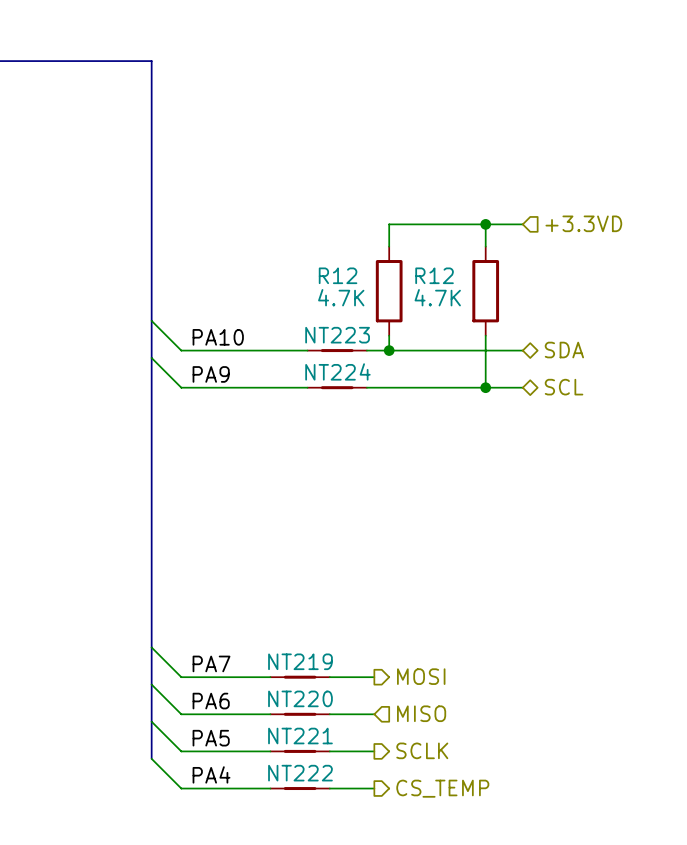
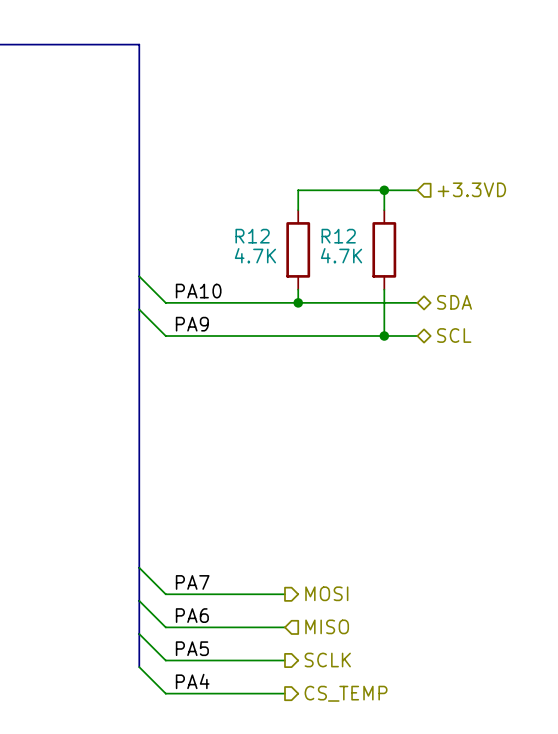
bus: (151, 61) (151, 758) -> (86, 44) (139, 44) (139, 667)
wire: (151, 320) (181, 350) -> none
label position: PA10 (218, 337) -> PA10 (198, 291)
wire: (181, 350) (240, 350) -> (139, 276) (165, 302)
NT223: (337, 350) -> none
wire: (151, 358) (181, 387) -> none
label position: PA9 (211, 374) -> PA9 (192, 324)
wire: (181, 387) (240, 387) -> (139, 309) (165, 336)
NT224: (337, 387) -> none
wire: (151, 647) (181, 677) -> none
label position: PA7 (211, 663) -> PA7 (192, 582)
wire: (181, 677) (240, 677) -> (139, 567) (165, 594)
NT219: (300, 677) -> none
wire: (151, 684) (181, 714) -> none
label position: PA6 (211, 701) -> PA6 (192, 615)
wire: (181, 714) (240, 714) -> (139, 600) (165, 627)
NT220: (300, 714) -> none
wire: (151, 721) (181, 751) -> none
label position: PA5 (211, 738) -> PA5 (192, 648)
wire: (181, 751) (240, 751) -> (139, 634) (165, 660)
NT221: (300, 751) -> none
wire: (151, 758) (181, 788) -> none
label position: PA4 (211, 774) -> PA4 (192, 681)
wire: (181, 788) (240, 788) -> (139, 667) (165, 693)
NT222: (300, 788) -> none

